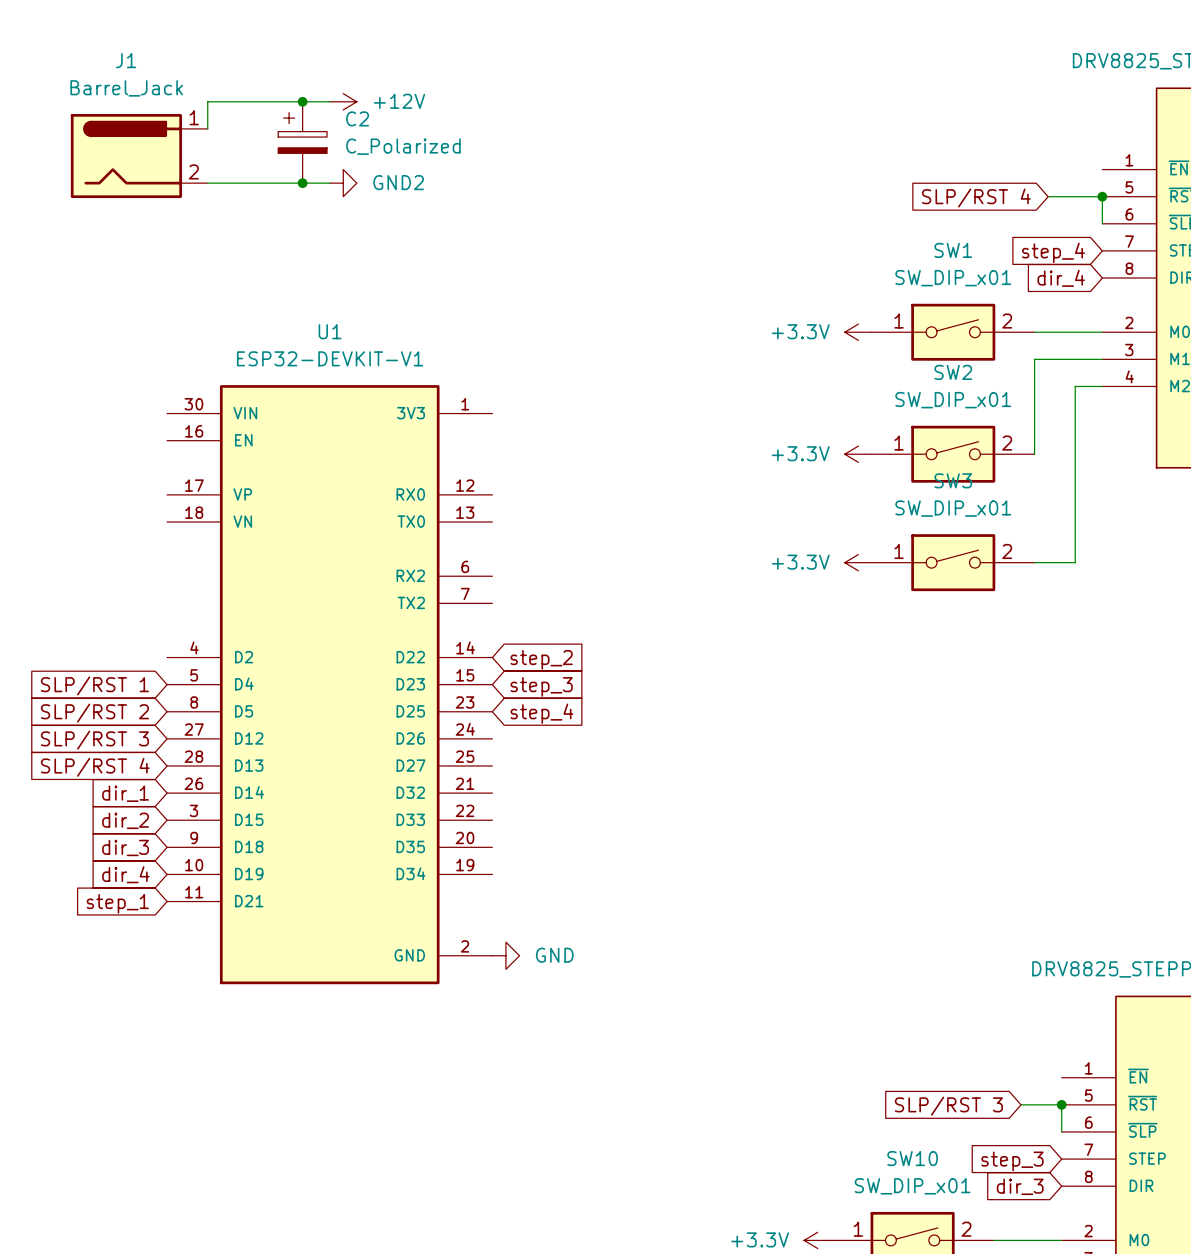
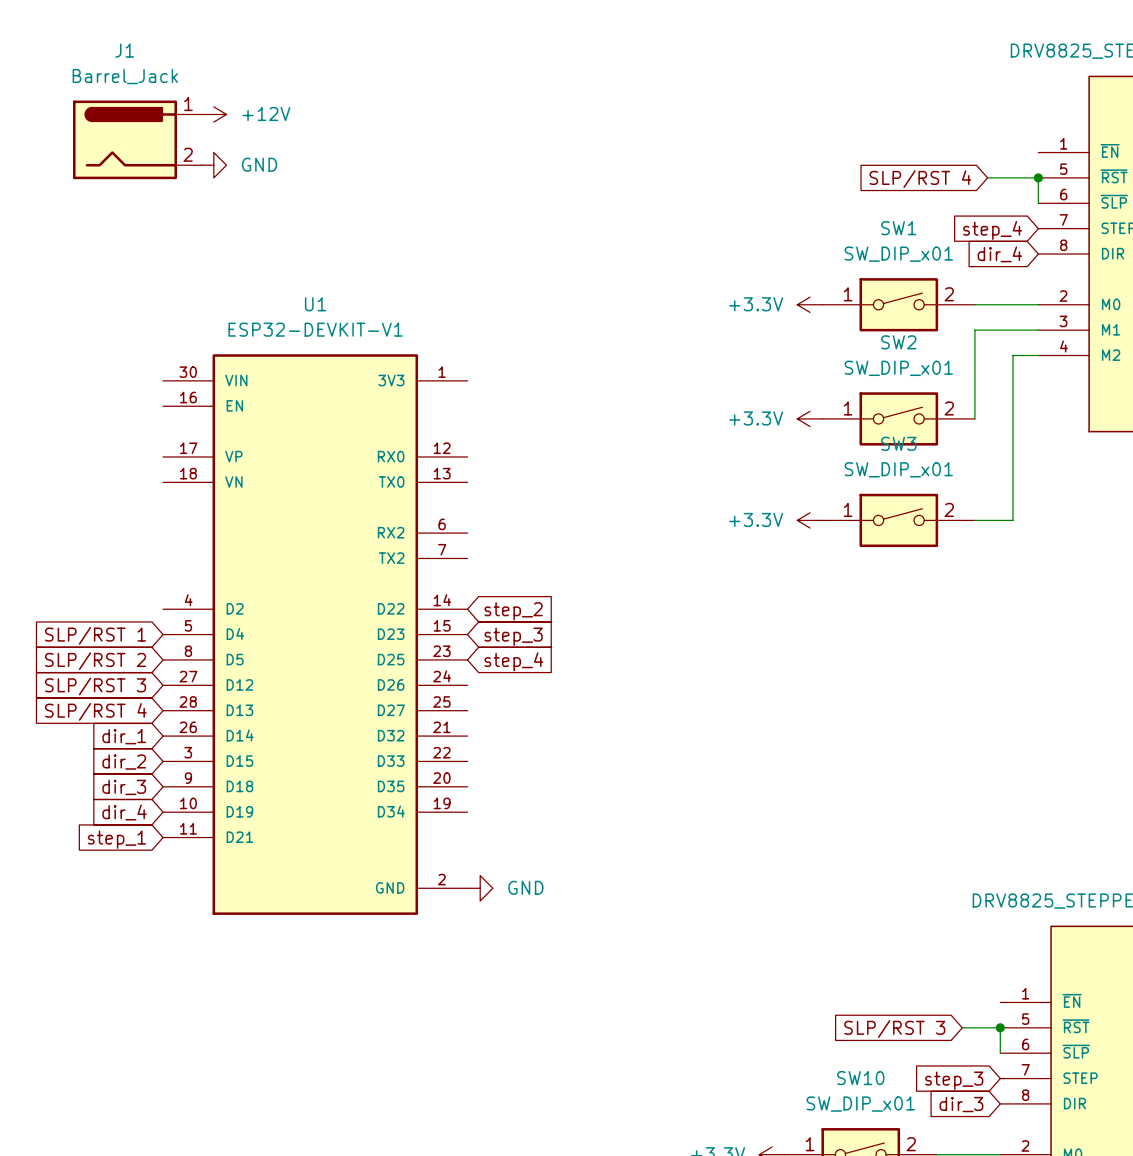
junction: (302, 101) -> none
wire: (329, 101) (207, 101) (207, 128) -> none
power symbol position: +12V (343, 101) -> +12V (213, 114)
C2: C_Polarized (302, 142) -> none
wire: (207, 183) (329, 183) -> none
power symbol: none -> GND (213, 165)
junction: (302, 183) -> none
power symbol: GND2 (343, 183) -> none

